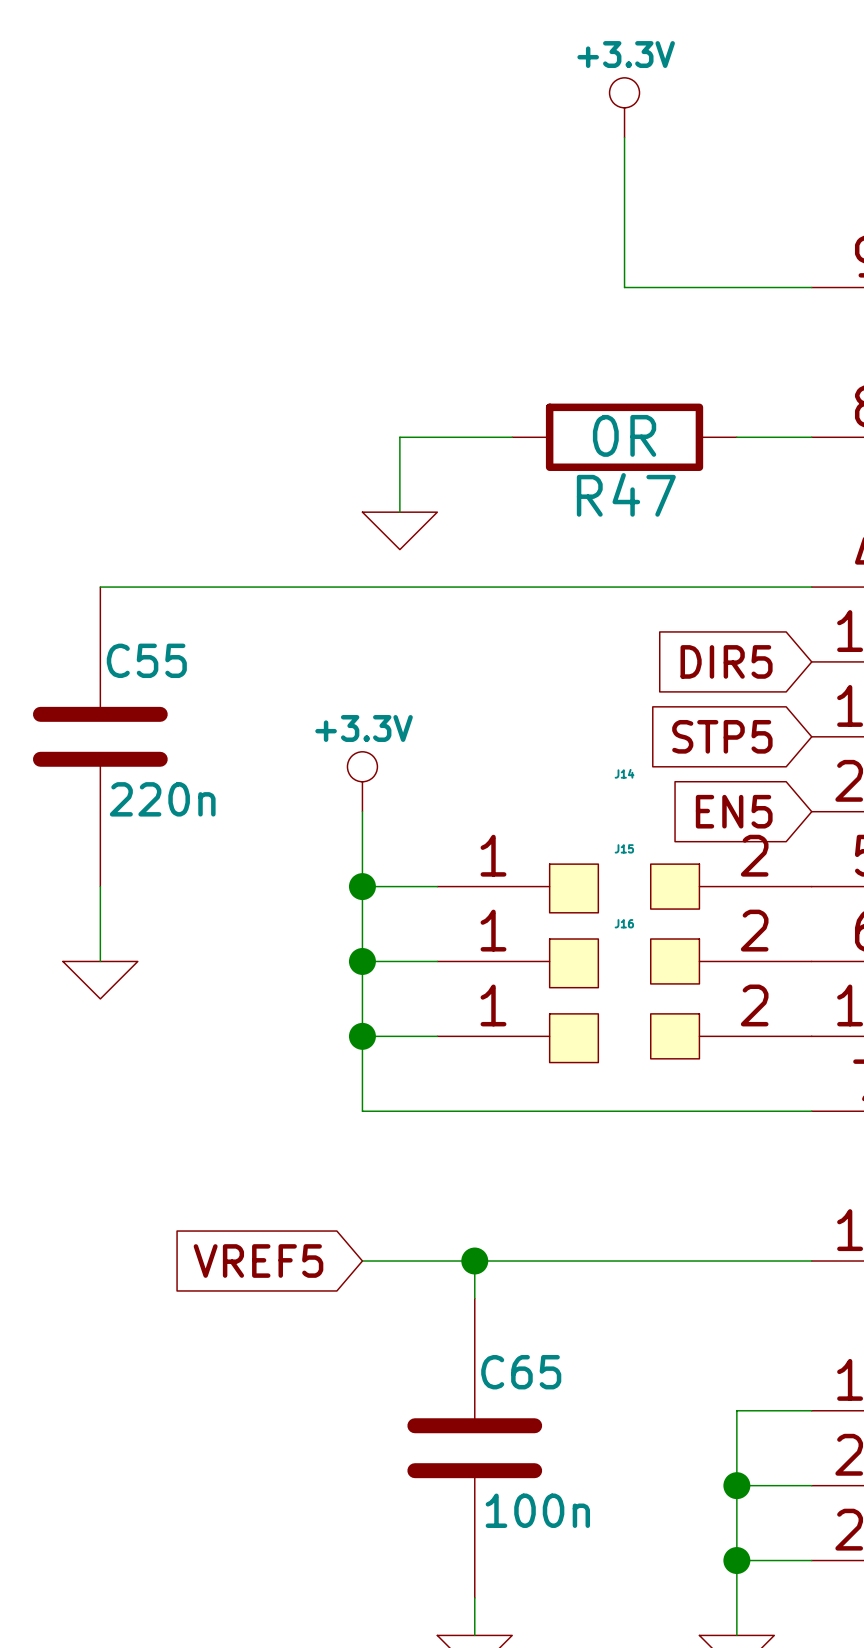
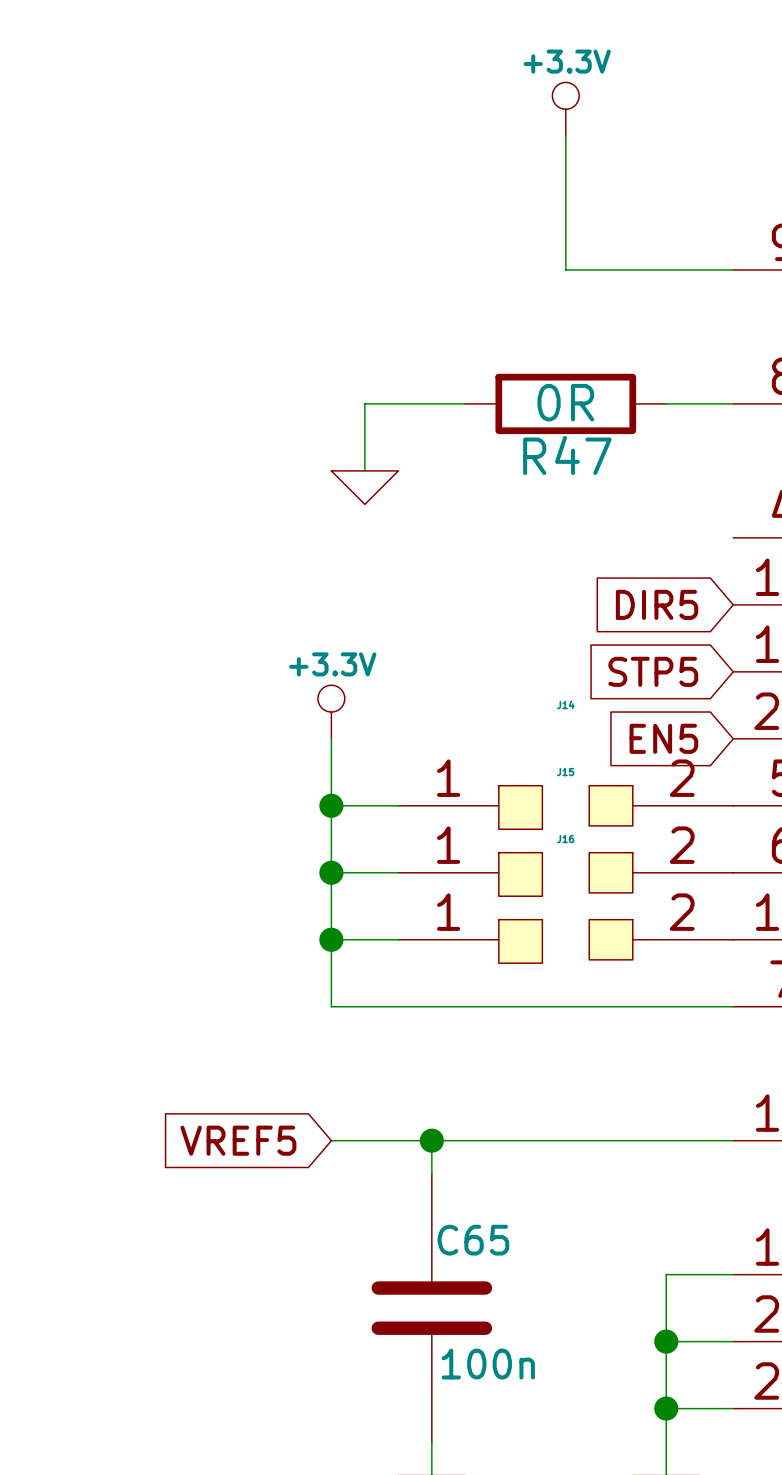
wire: (100, 587) (811, 587) -> none
C55: 220n (100, 736) -> none
wire: (100, 886) (100, 961) -> none
power symbol: (100, 980) -> none

